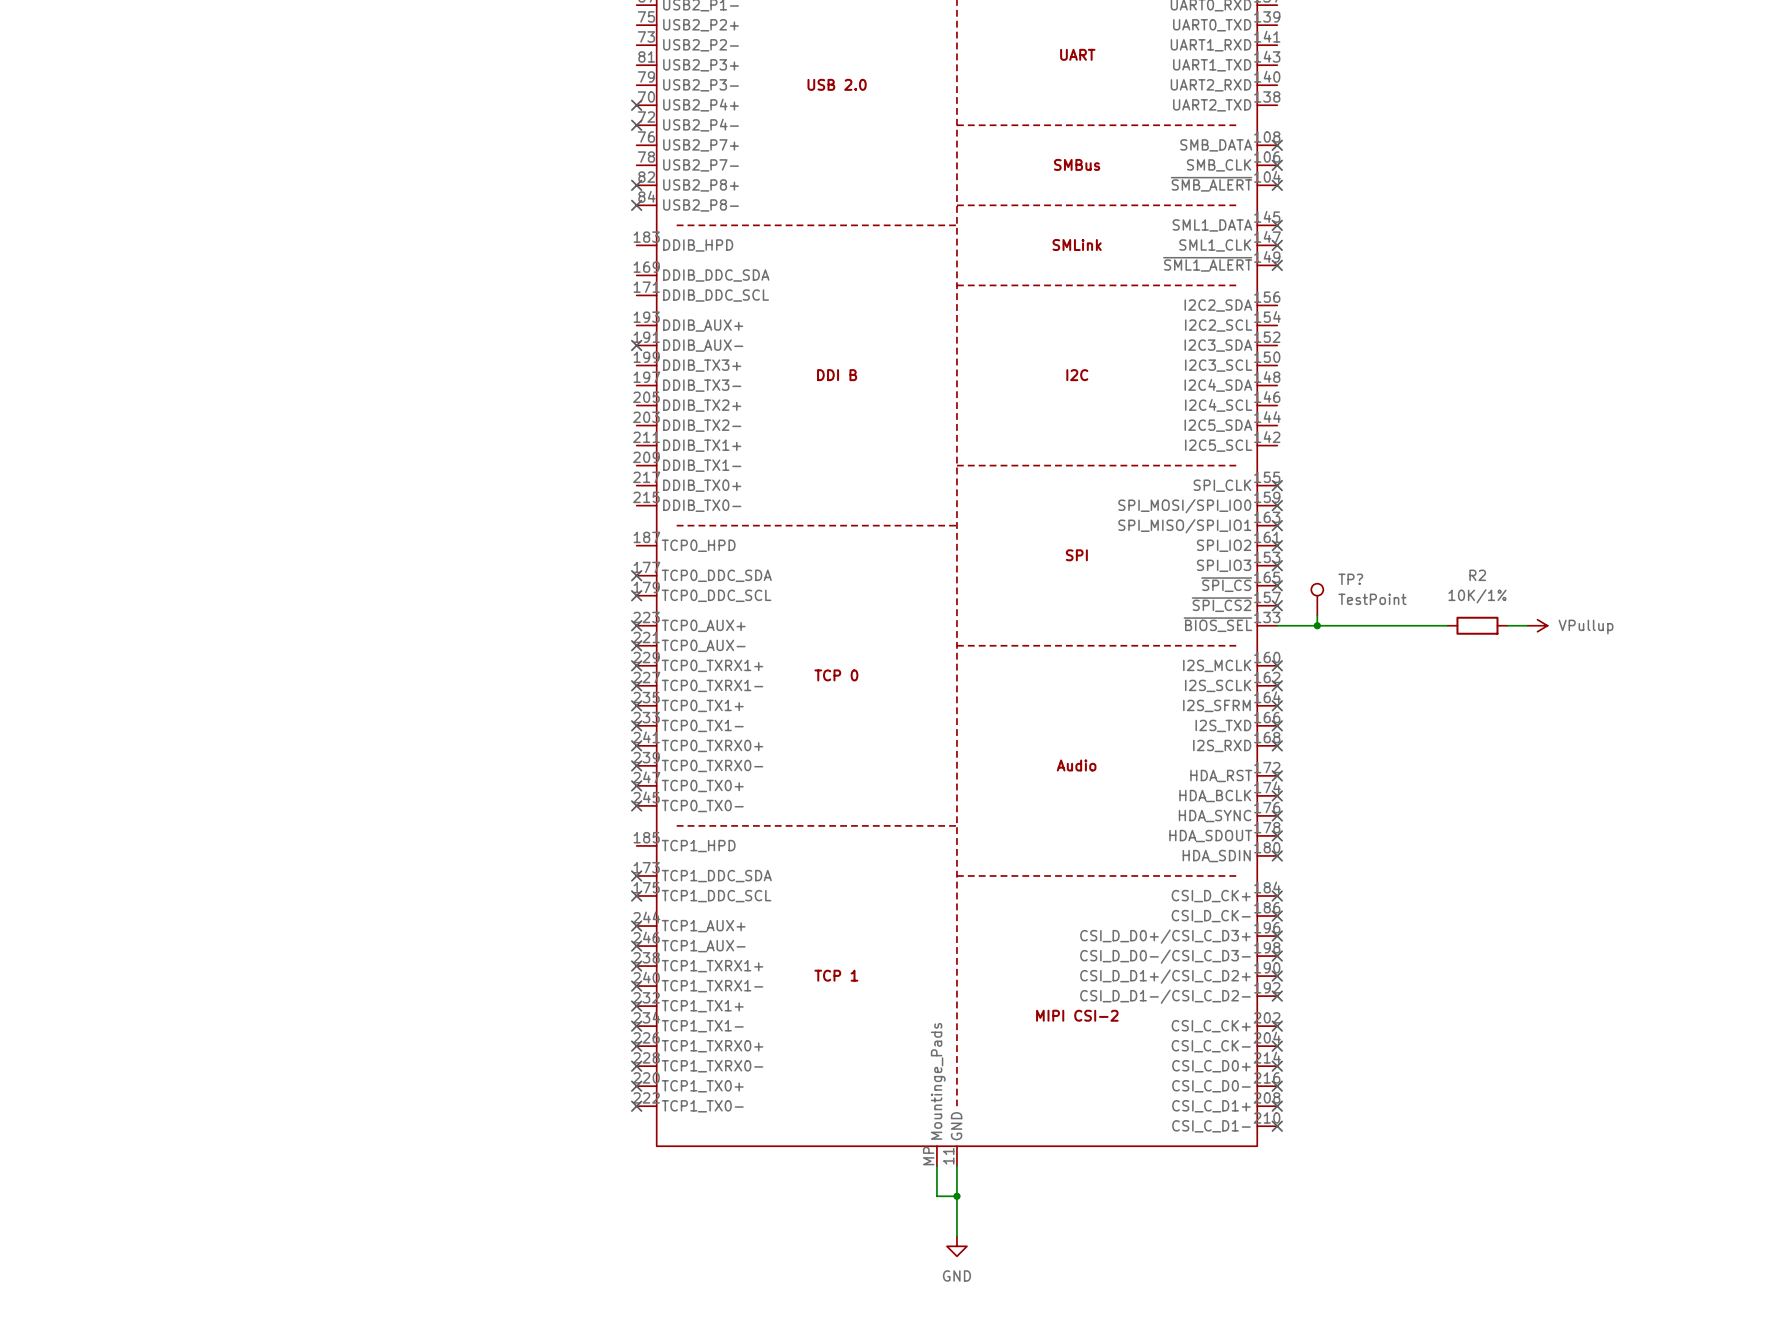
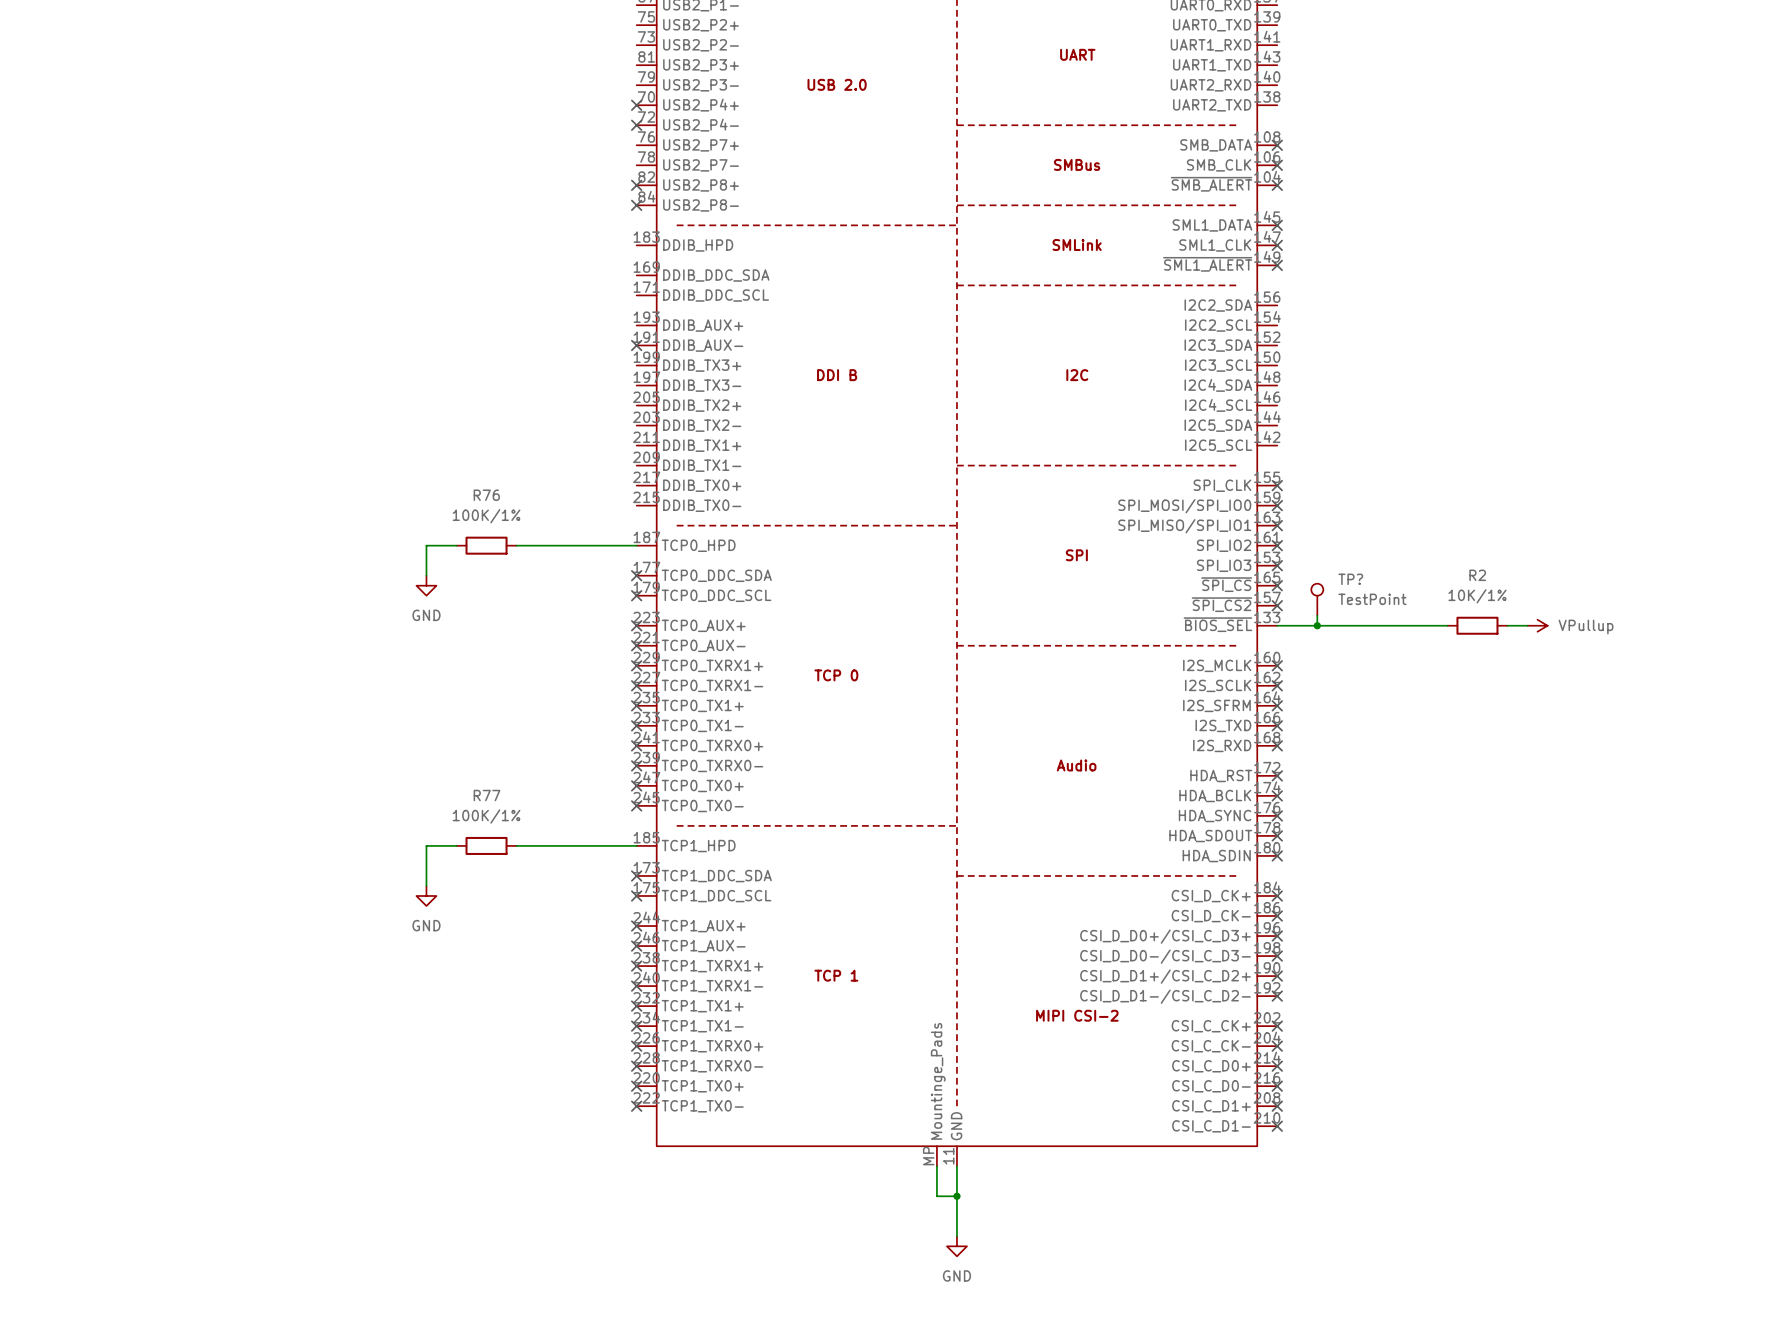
wire: none -> (456, 545) (426, 545) (426, 575)
R76: none -> 100K/1% (486, 545)
wire: none -> (516, 545) (636, 545)
power symbol: none -> GND (426, 585)
wire: none -> (456, 845) (426, 845) (426, 885)
R77: none -> 100K/1% (486, 845)
wire: none -> (516, 845) (636, 845)
power symbol: none -> GND (426, 895)

